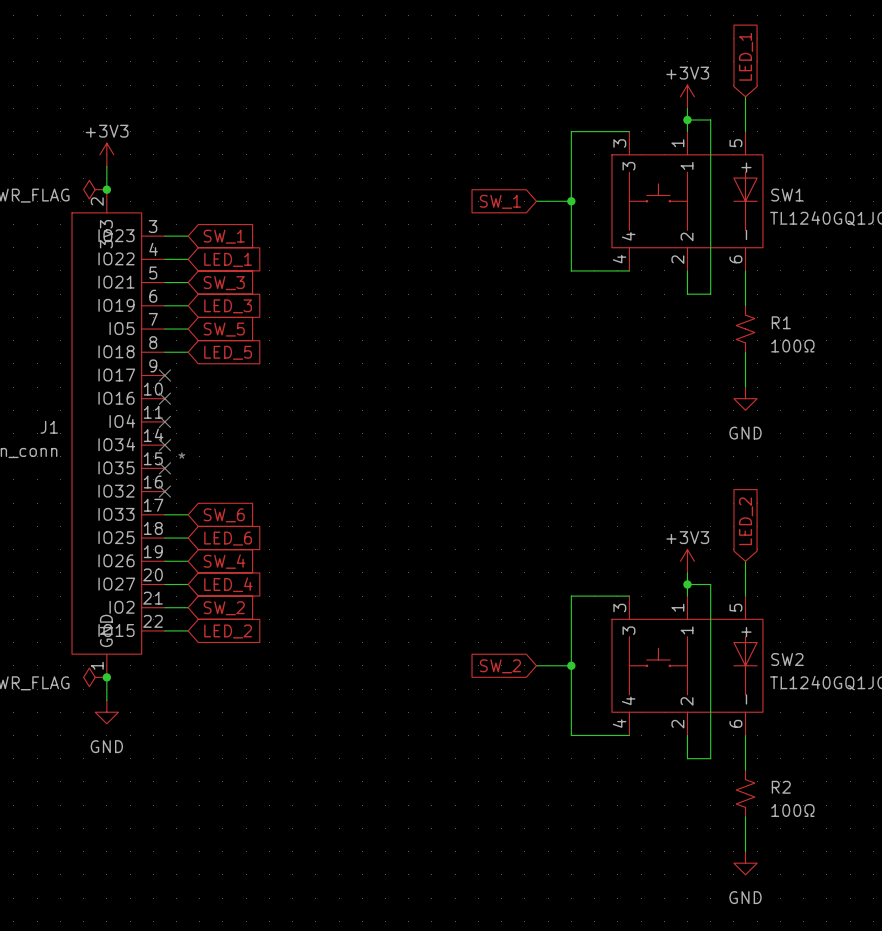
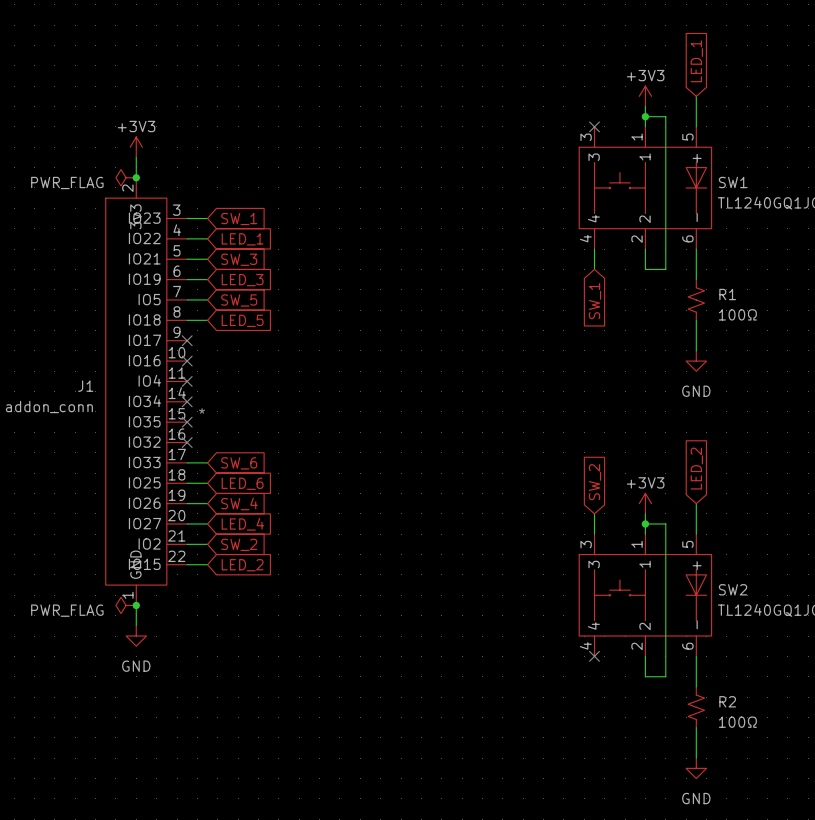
wire: (629, 131) (571, 131) (571, 270) (629, 270) -> (594, 269) (594, 249)
no-connect mark: none -> (594, 126)
global label rotation: 0° (500, 201) -> 90° counterclockwise (594, 301)
global label position: SW_1 (500, 201) -> SW_1 (594, 301)
wire: (536, 201) (571, 201) -> none
junction: (571, 201) -> none
wire: (629, 596) (571, 596) (571, 735) (629, 735) -> (594, 534) (594, 513)
wire: (536, 665) (571, 665) -> none
junction: (571, 665) -> none
global label rotation: 0° (500, 666) -> 90° clockwise (594, 482)
global label position: SW_2 (500, 666) -> SW_2 (594, 482)
no-connect mark: none -> (594, 656)

